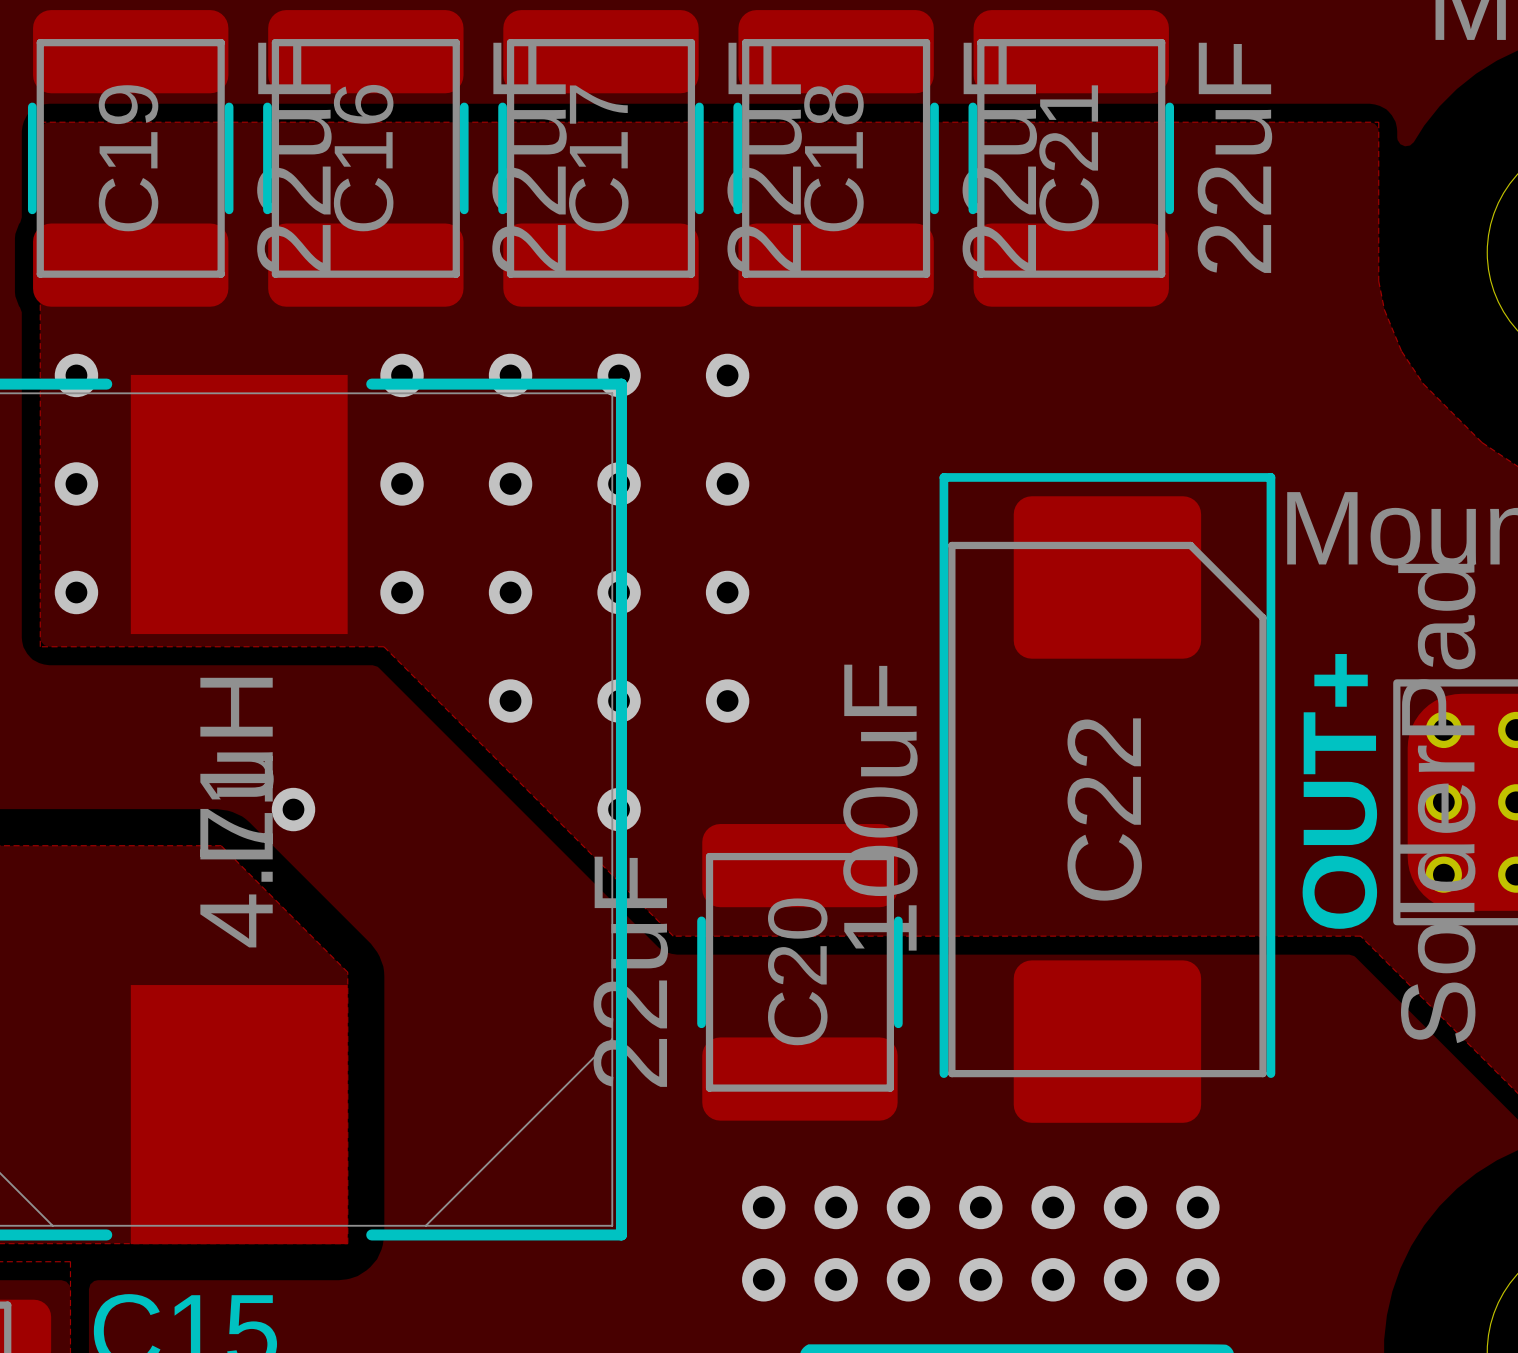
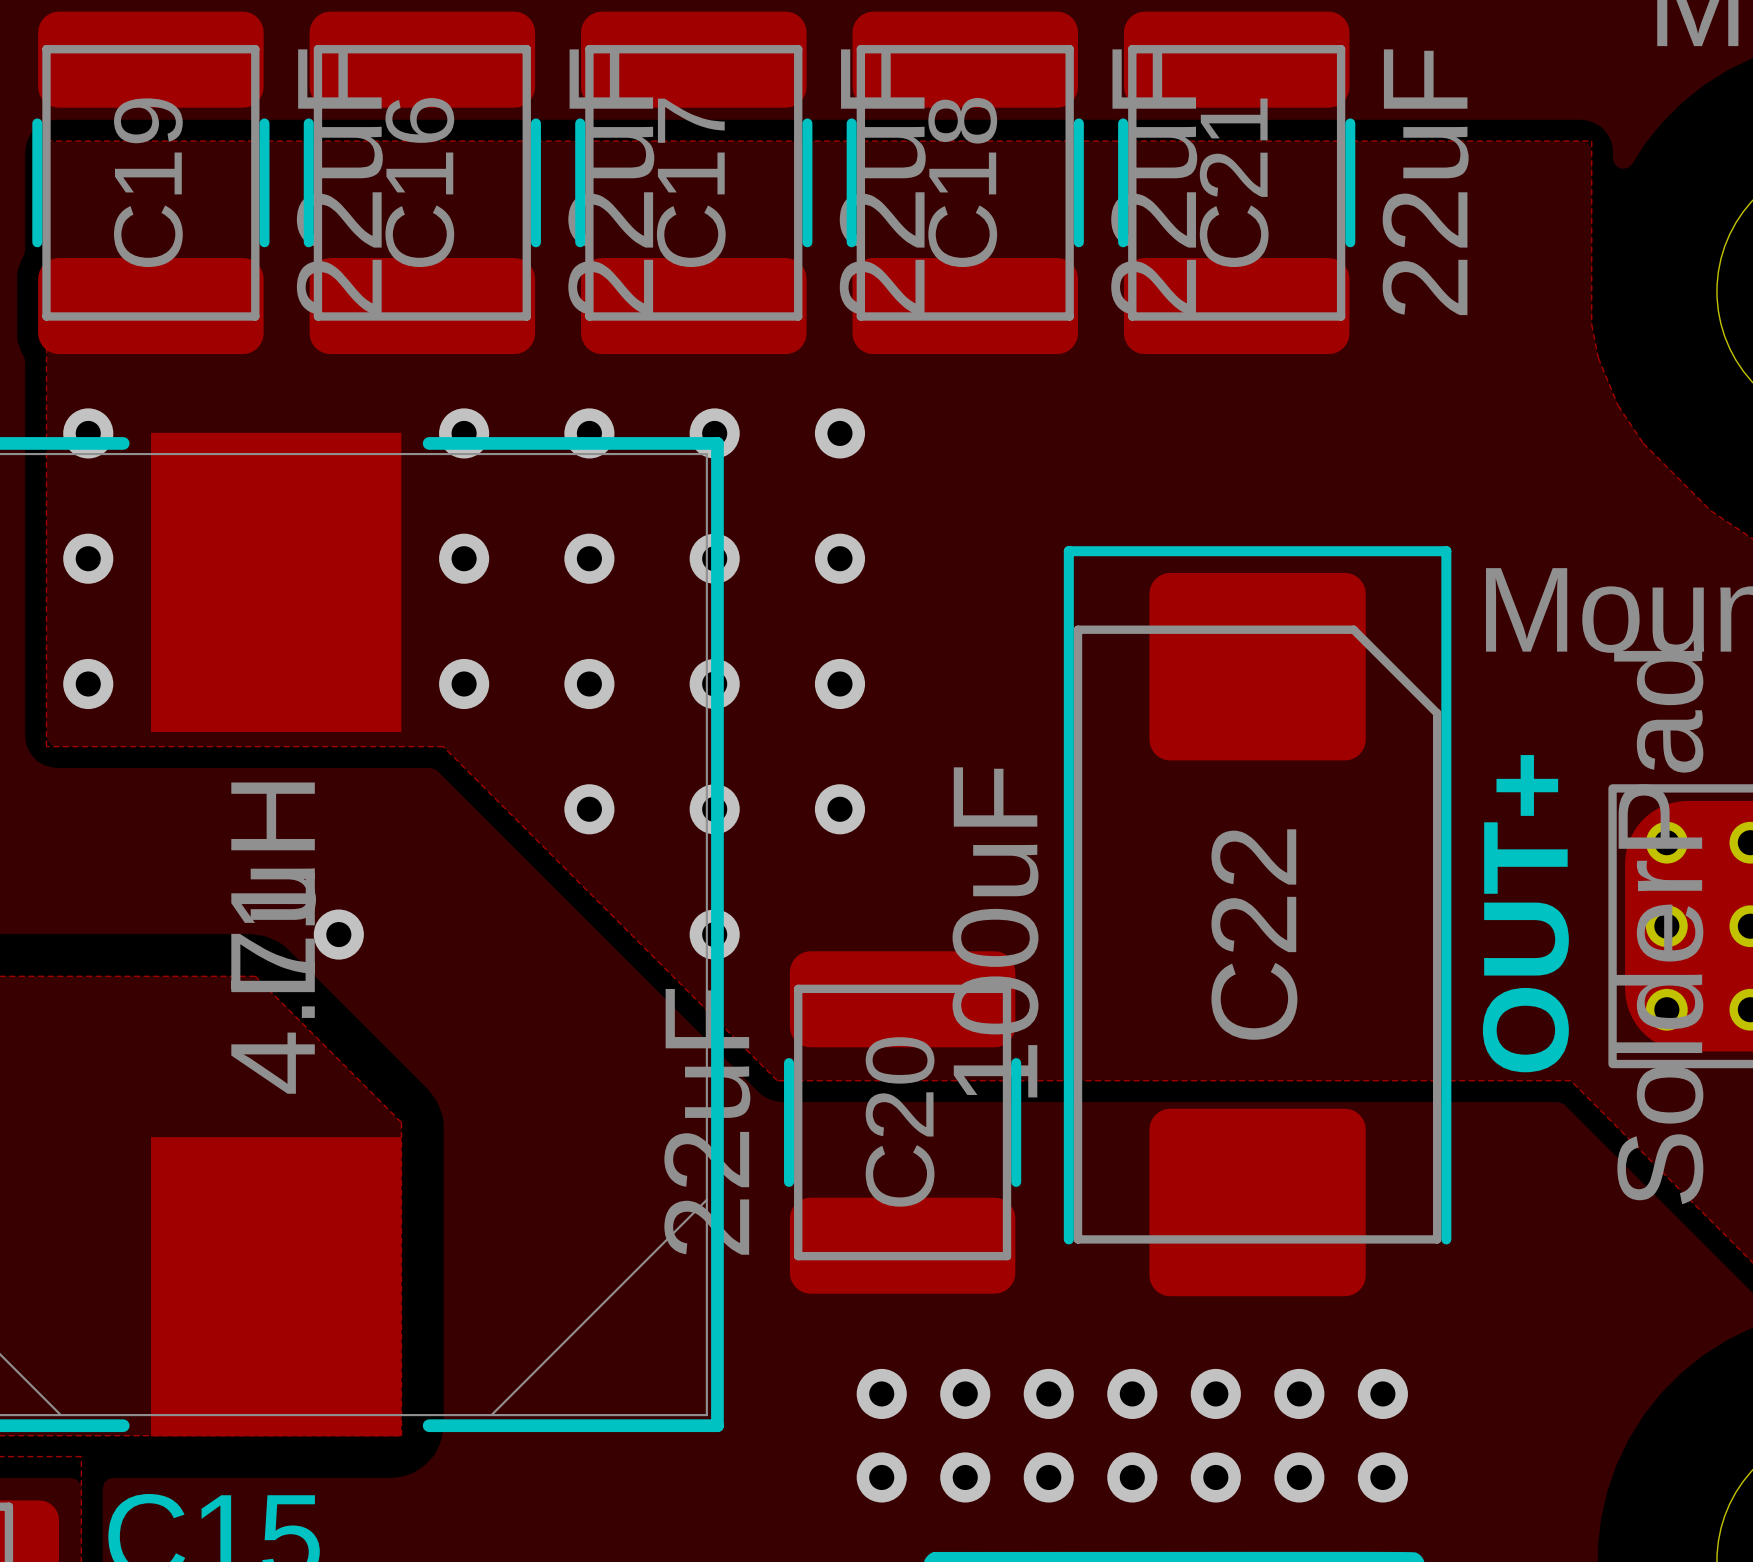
text position: OUT+ (1339, 791) -> OUT+ (1525, 913)
C22 position: (1107, 797) -> (1257, 921)
C20 position: (799, 972) -> (902, 1122)

